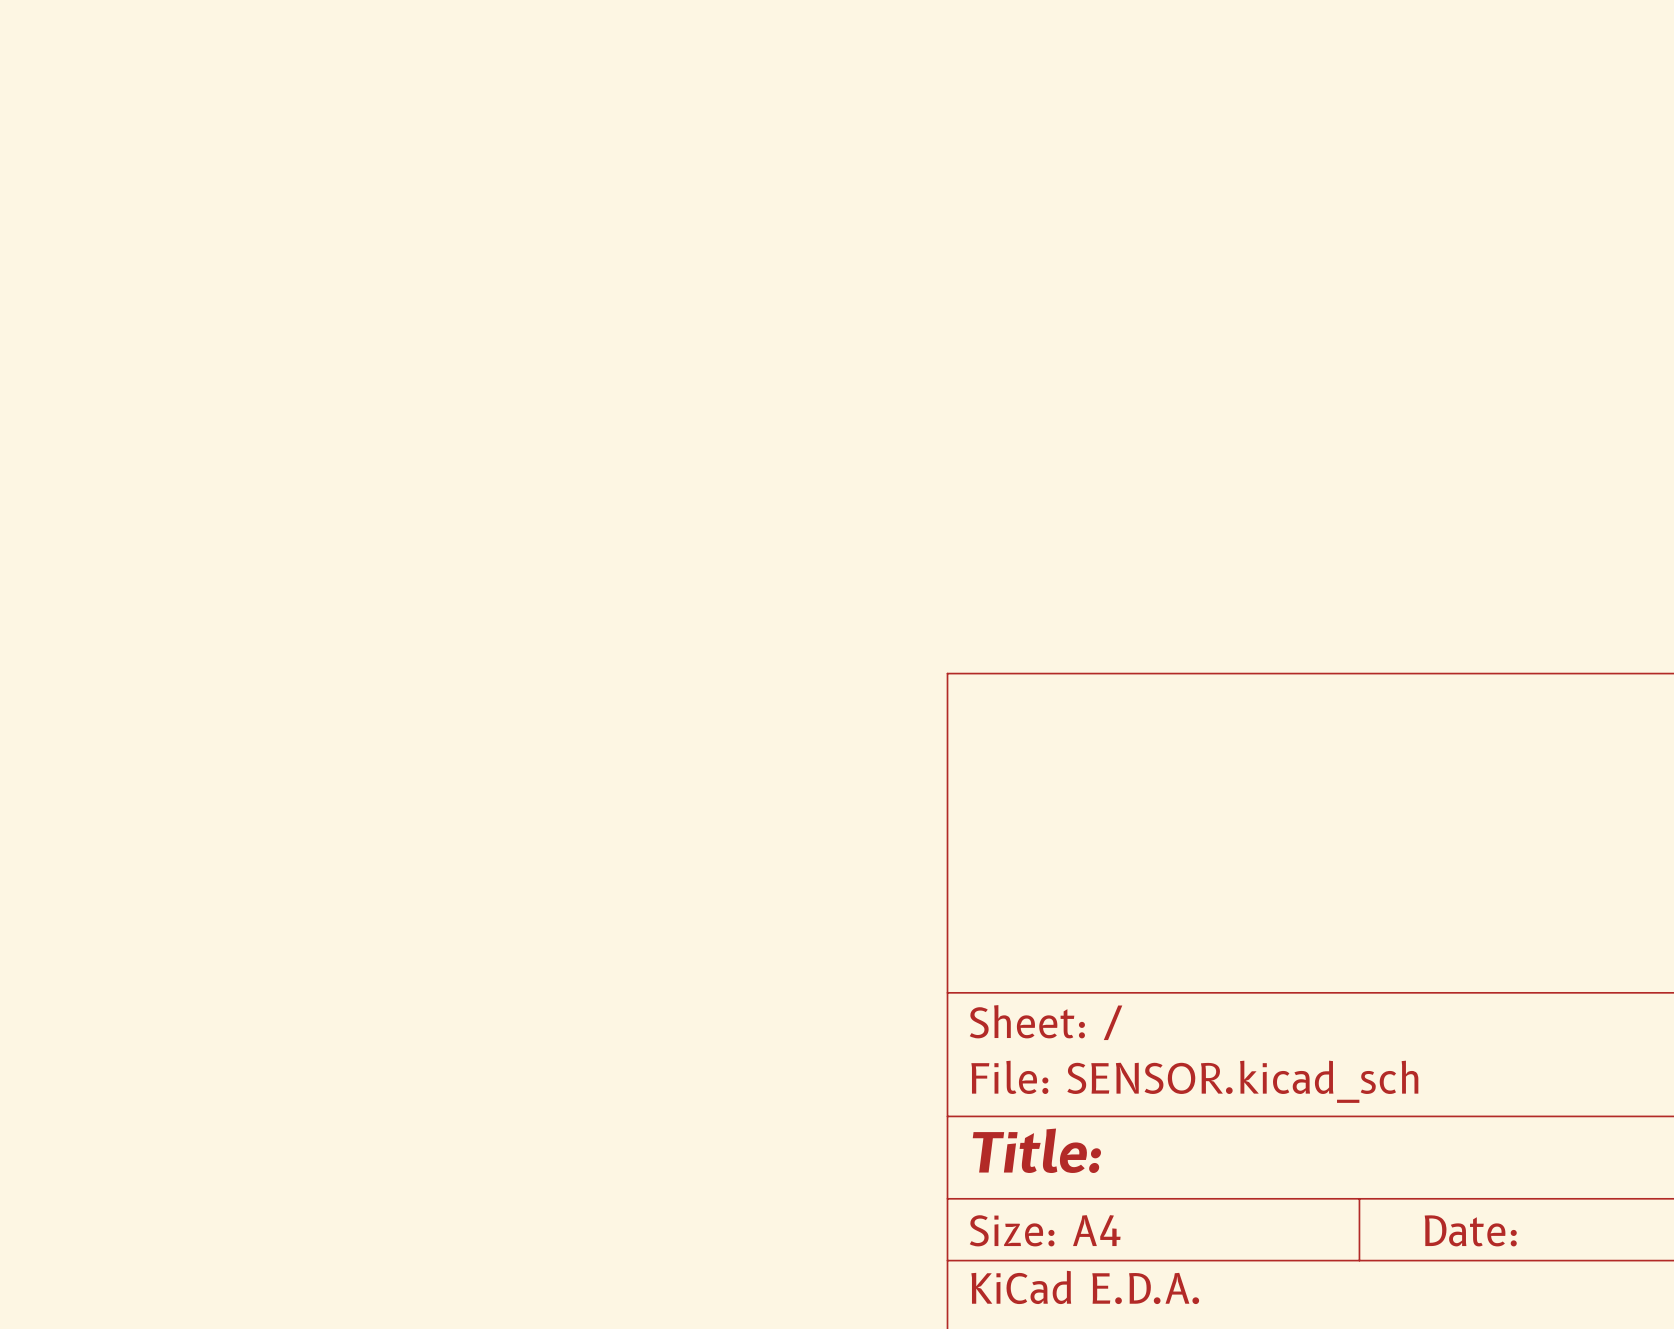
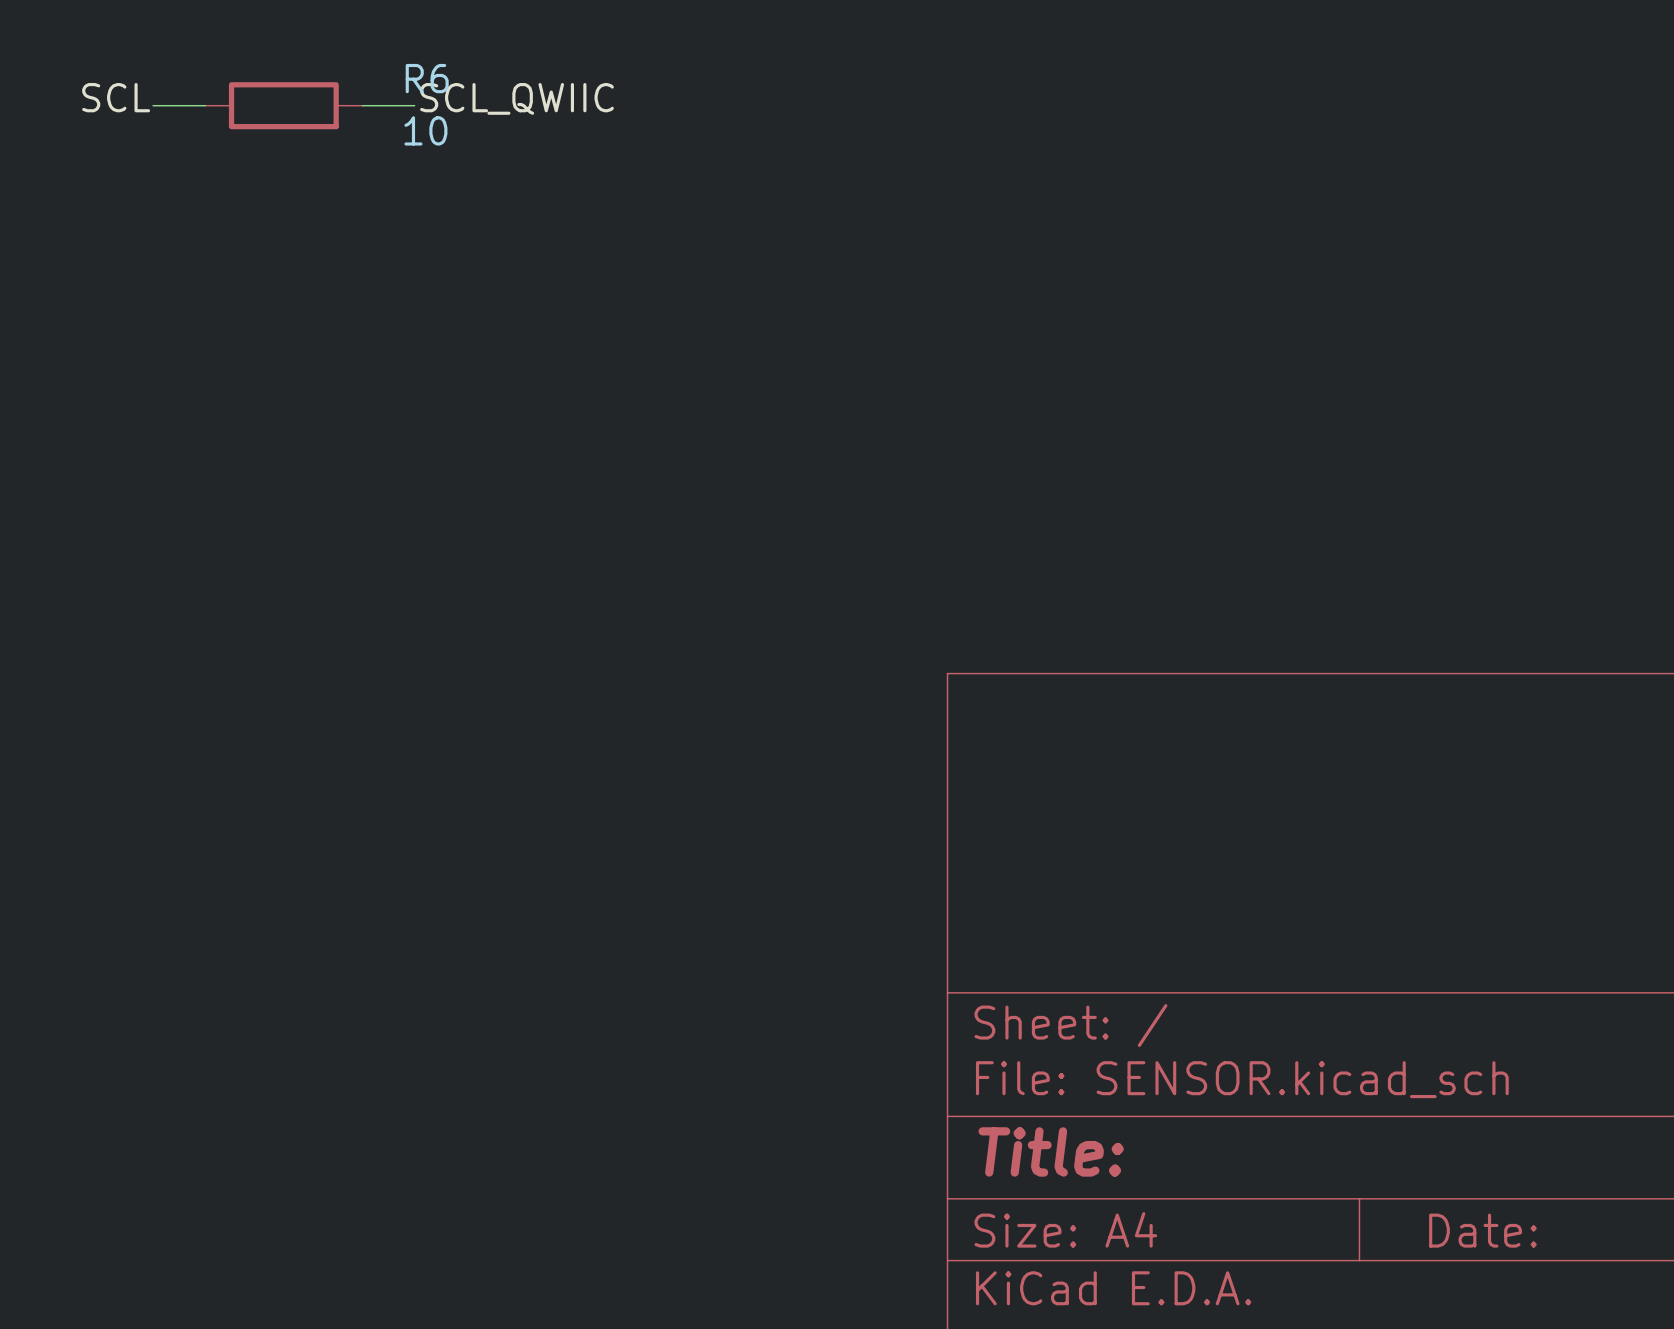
label: none -> SCL (116, 97)
label: none -> SCL_QWIIC (516, 98)
wire: none -> (153, 105) (205, 105)
R6: none -> 10 (283, 105)
wire: none -> (362, 105) (414, 105)

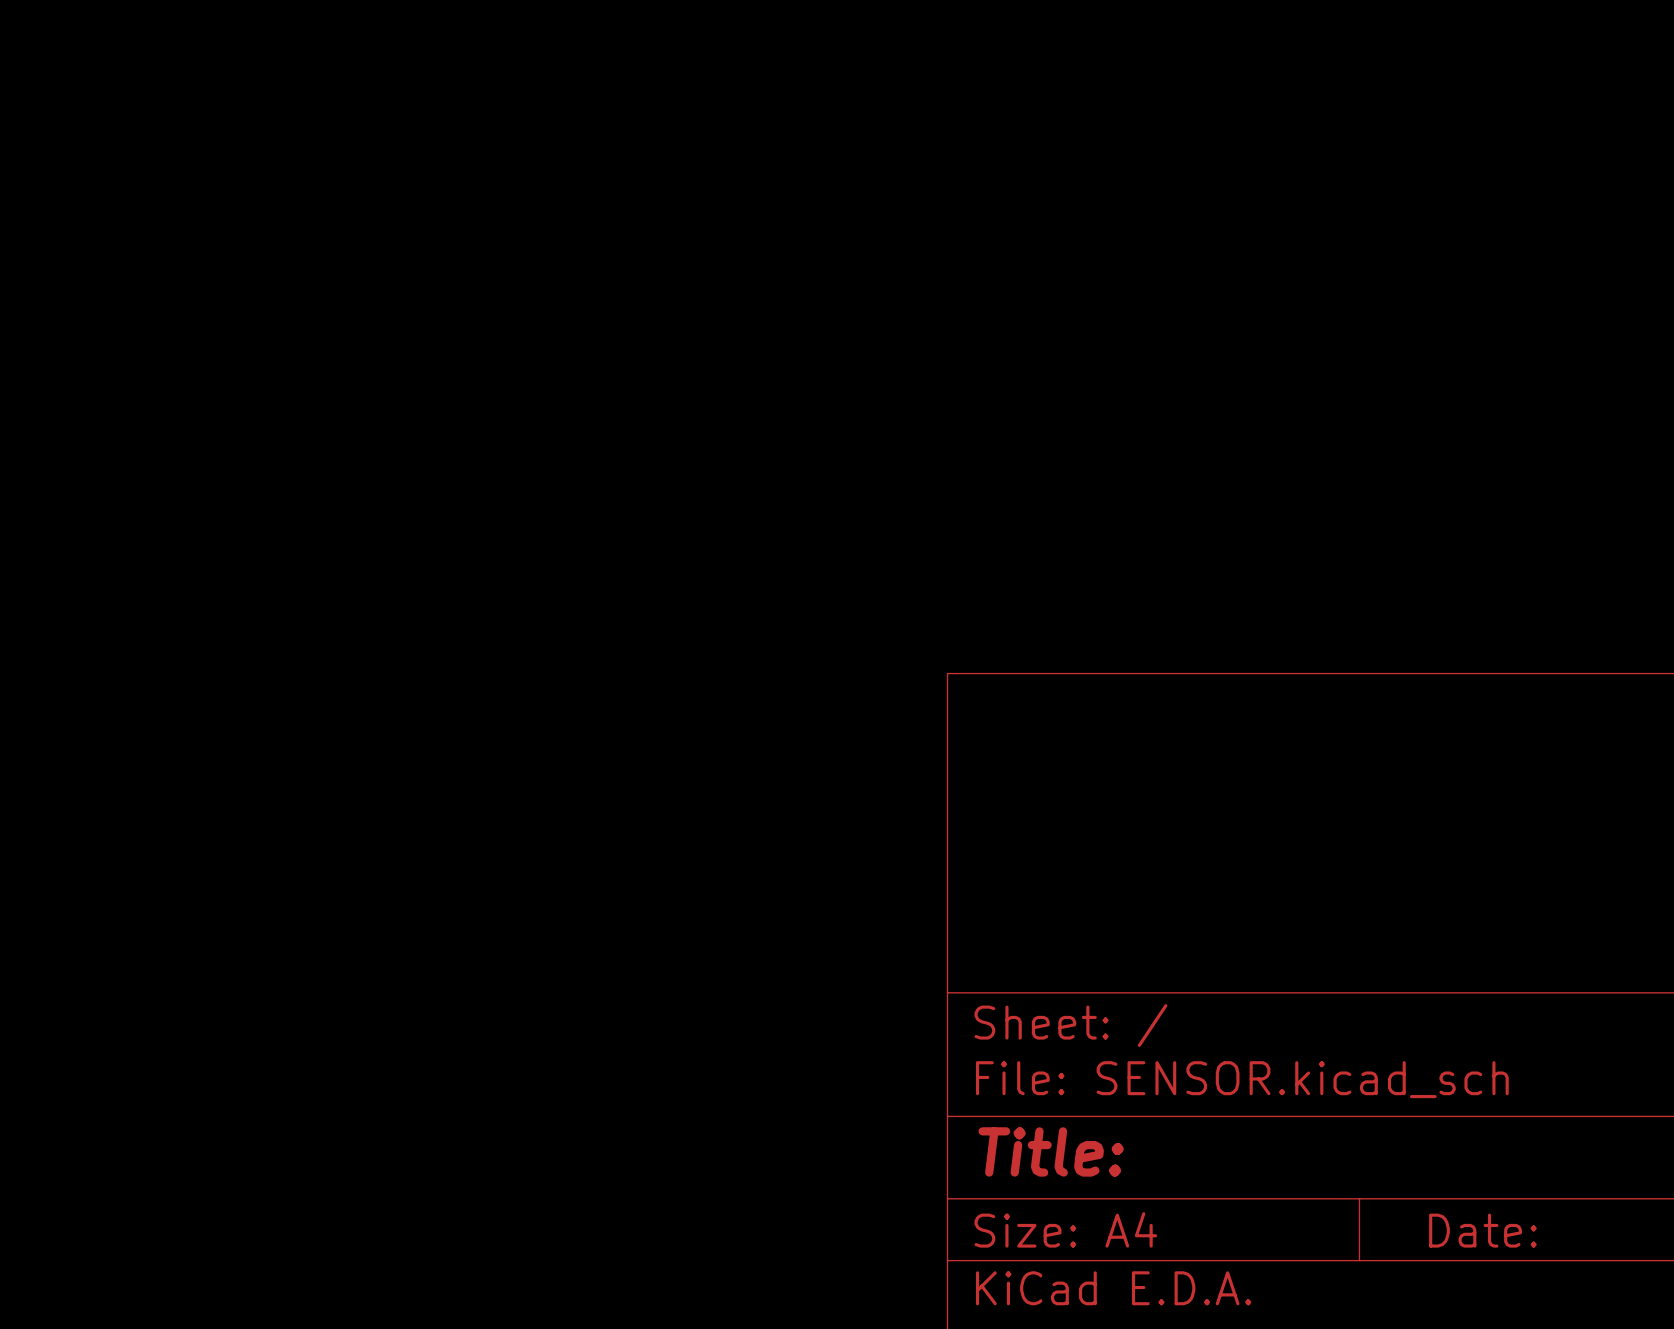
label: SCL (116, 97) -> none
label: SCL_QWIIC (516, 98) -> none
wire: (153, 105) (205, 105) -> none
R6: 10 (283, 105) -> none
wire: (362, 105) (414, 105) -> none

